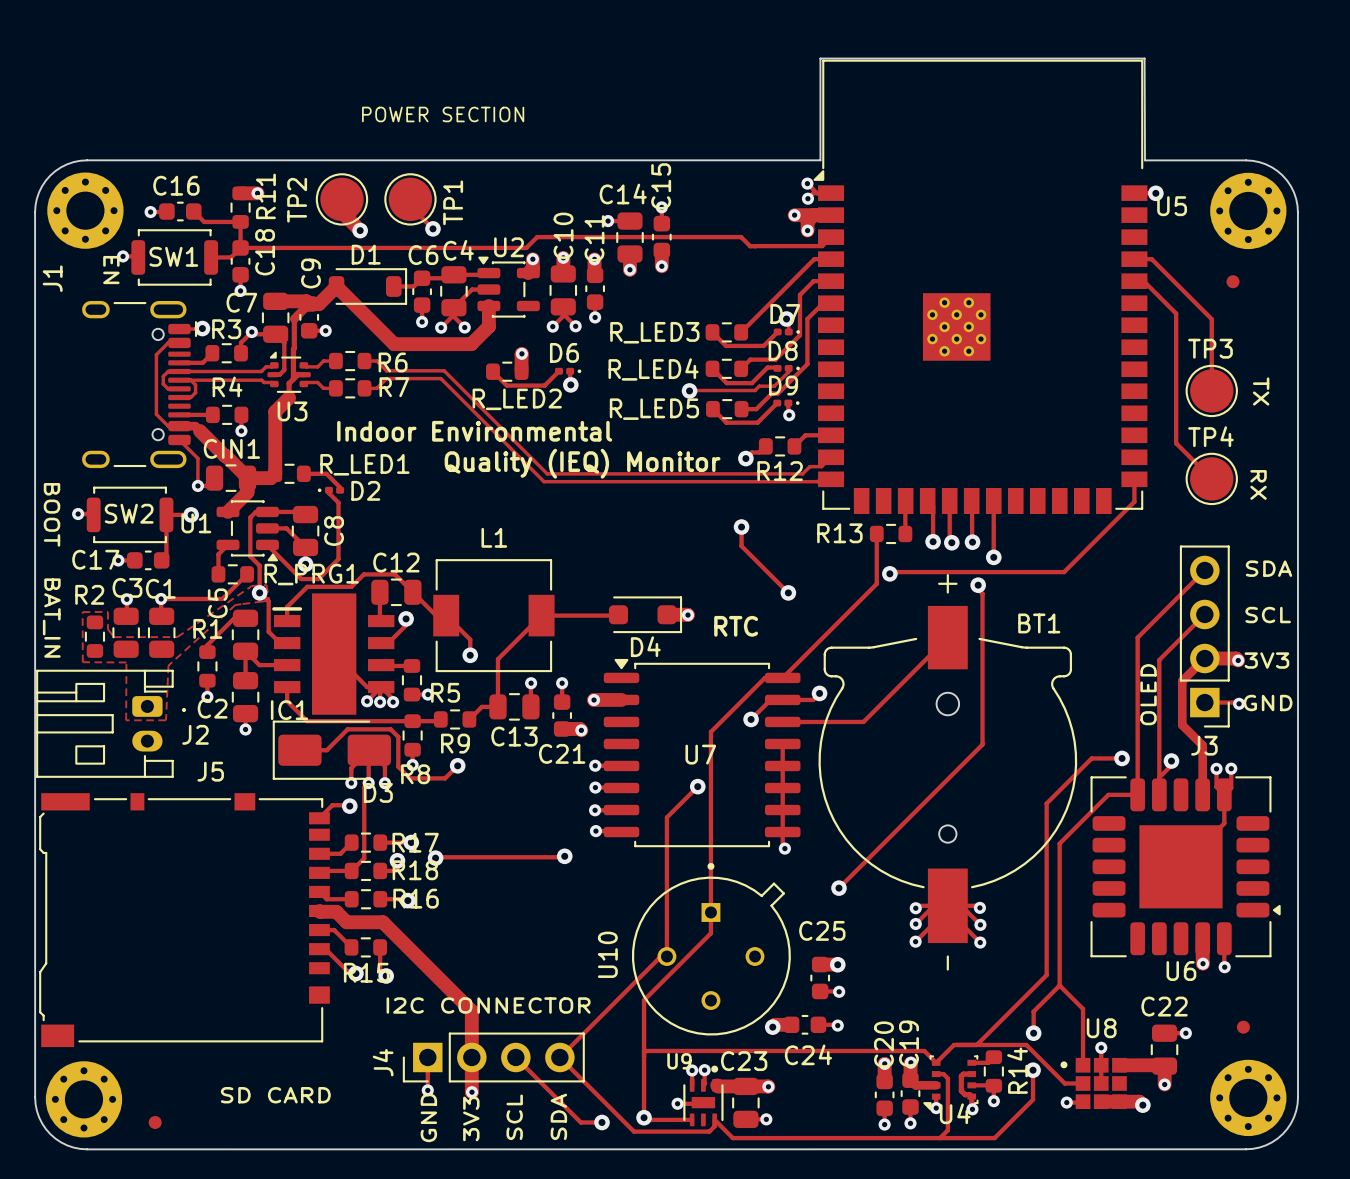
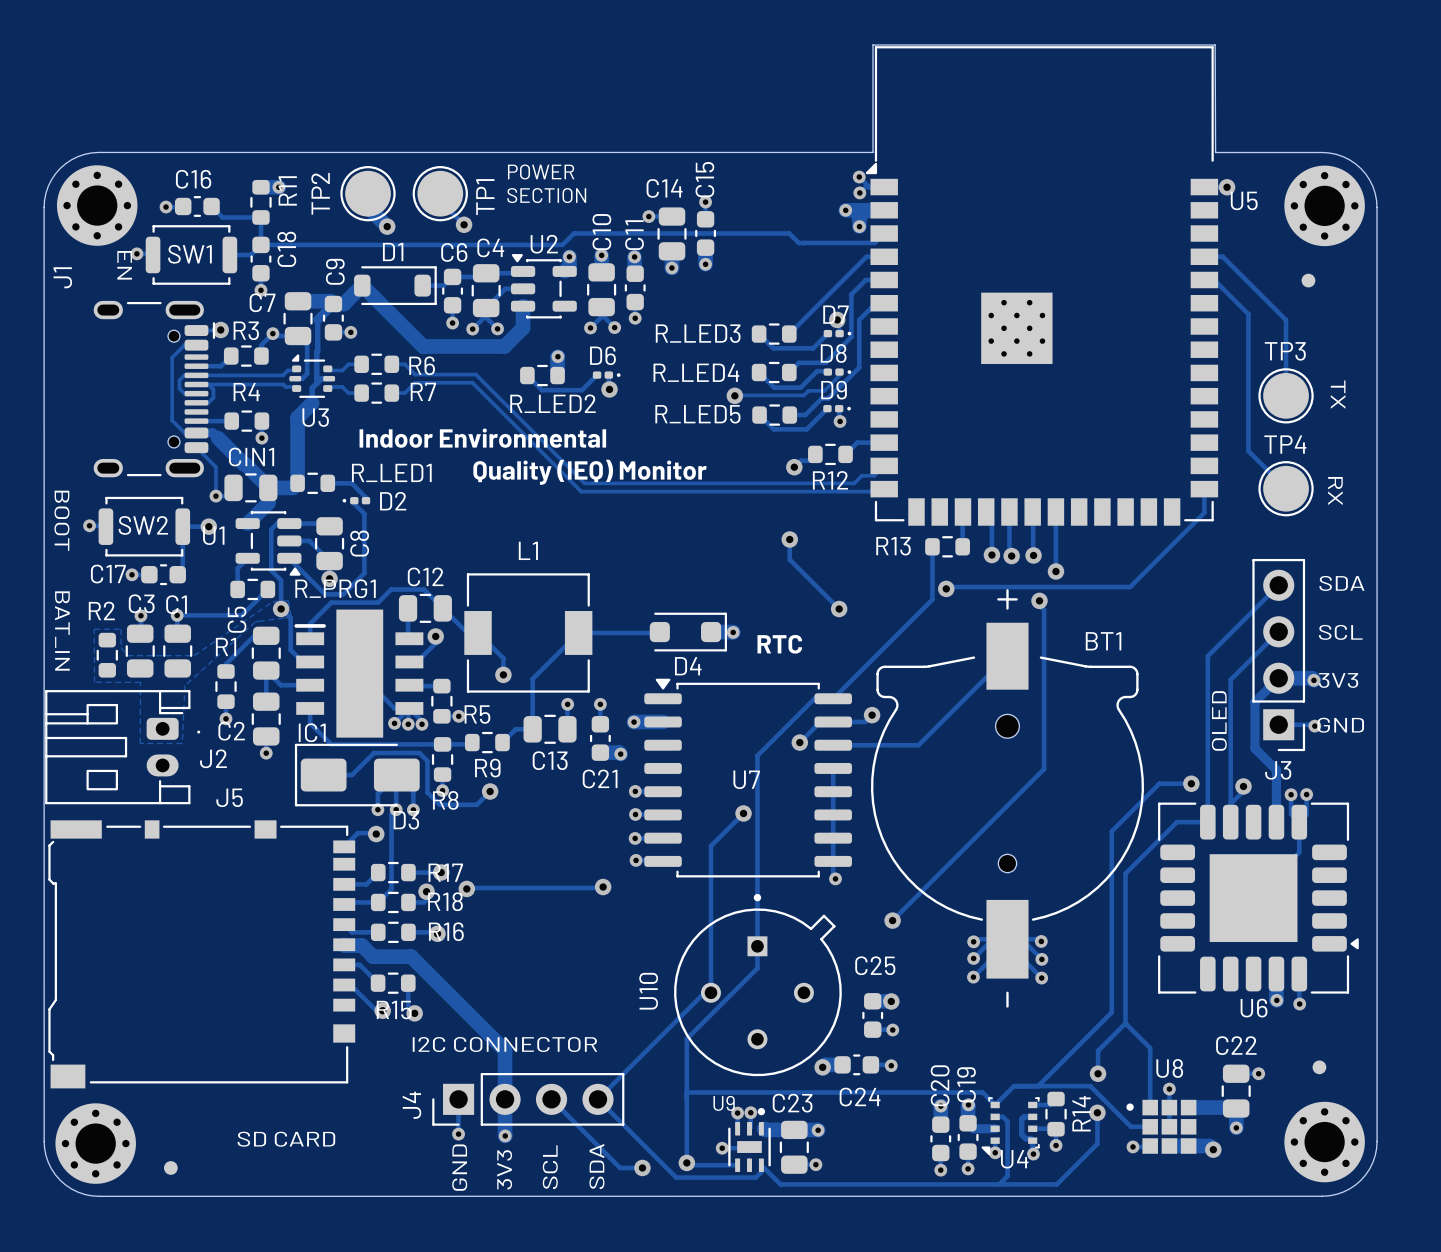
text: POWER SECTION (443, 114) -> none
text: none -> POWER (541, 171)
text: none -> SECTION (546, 195)

